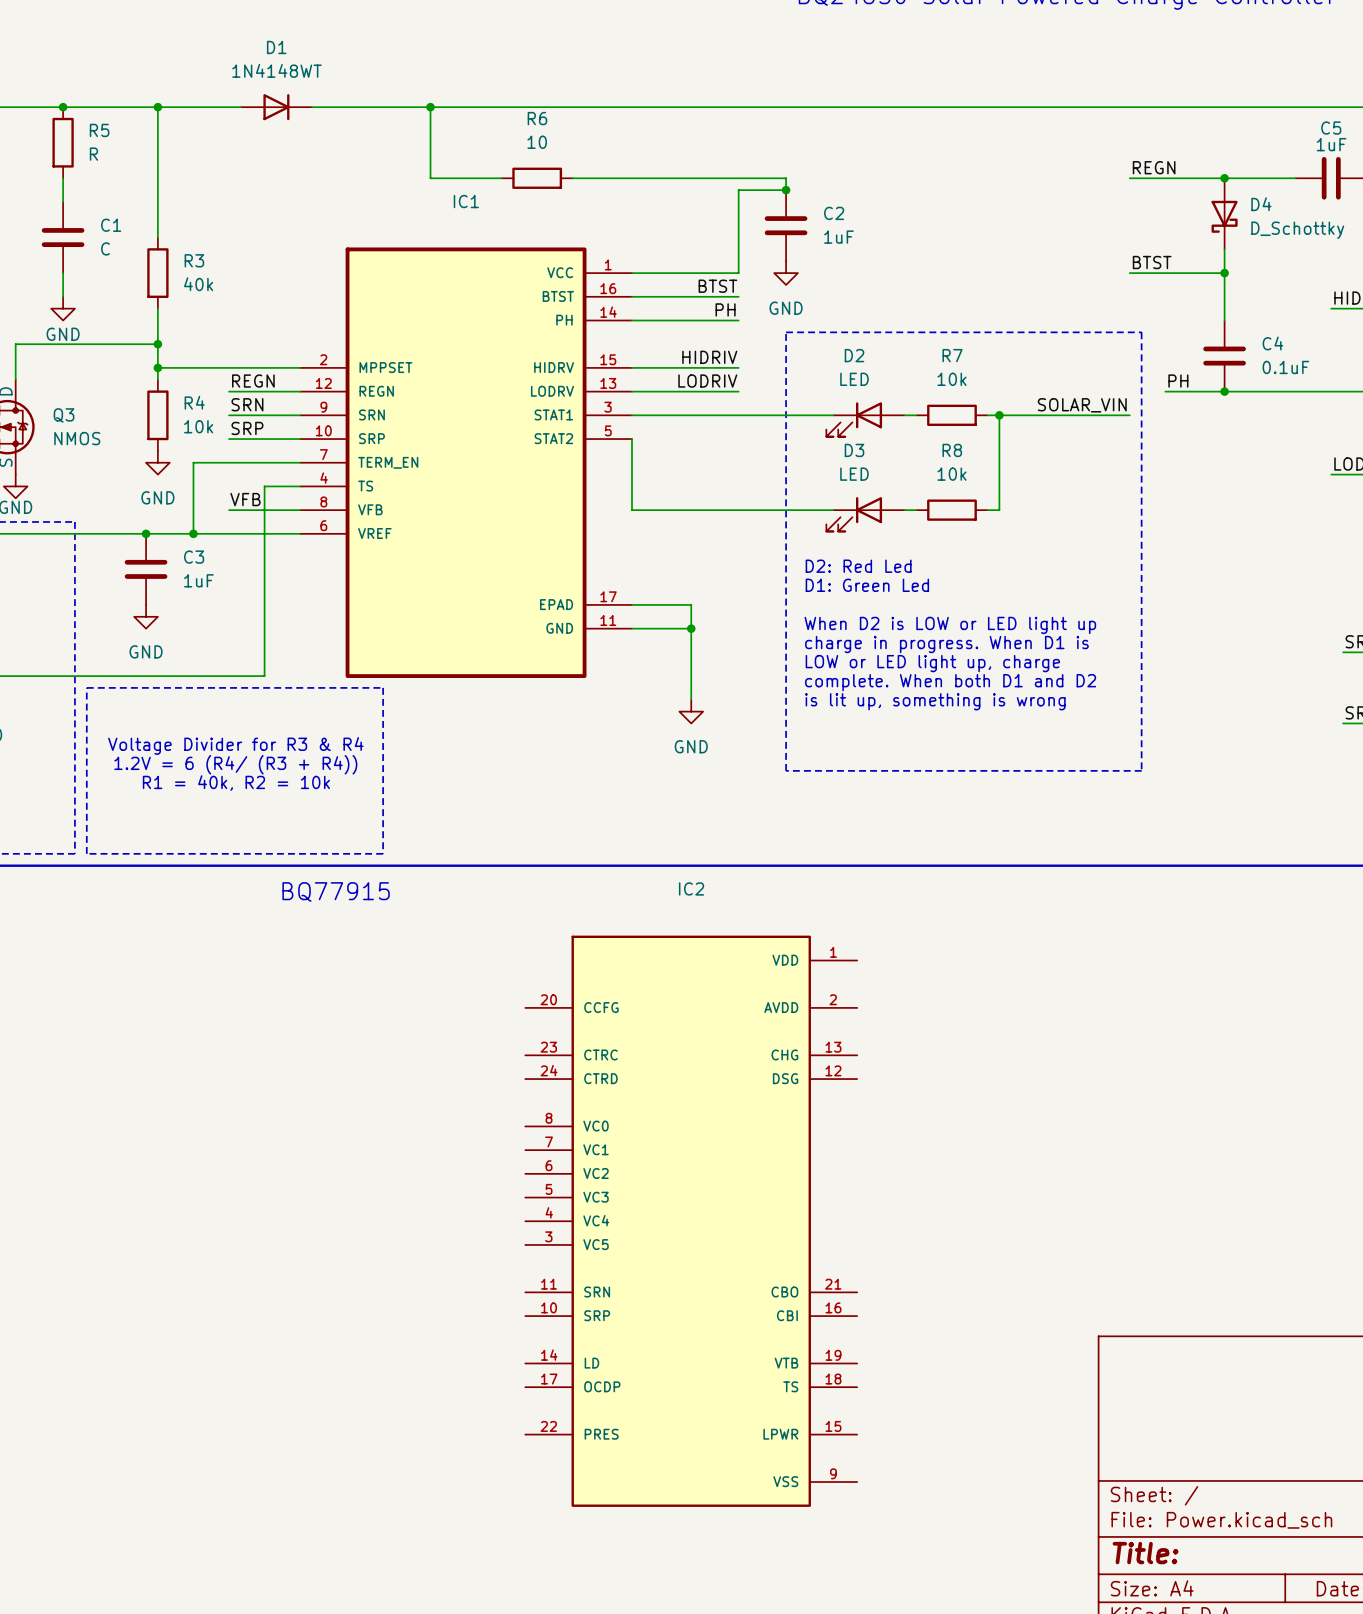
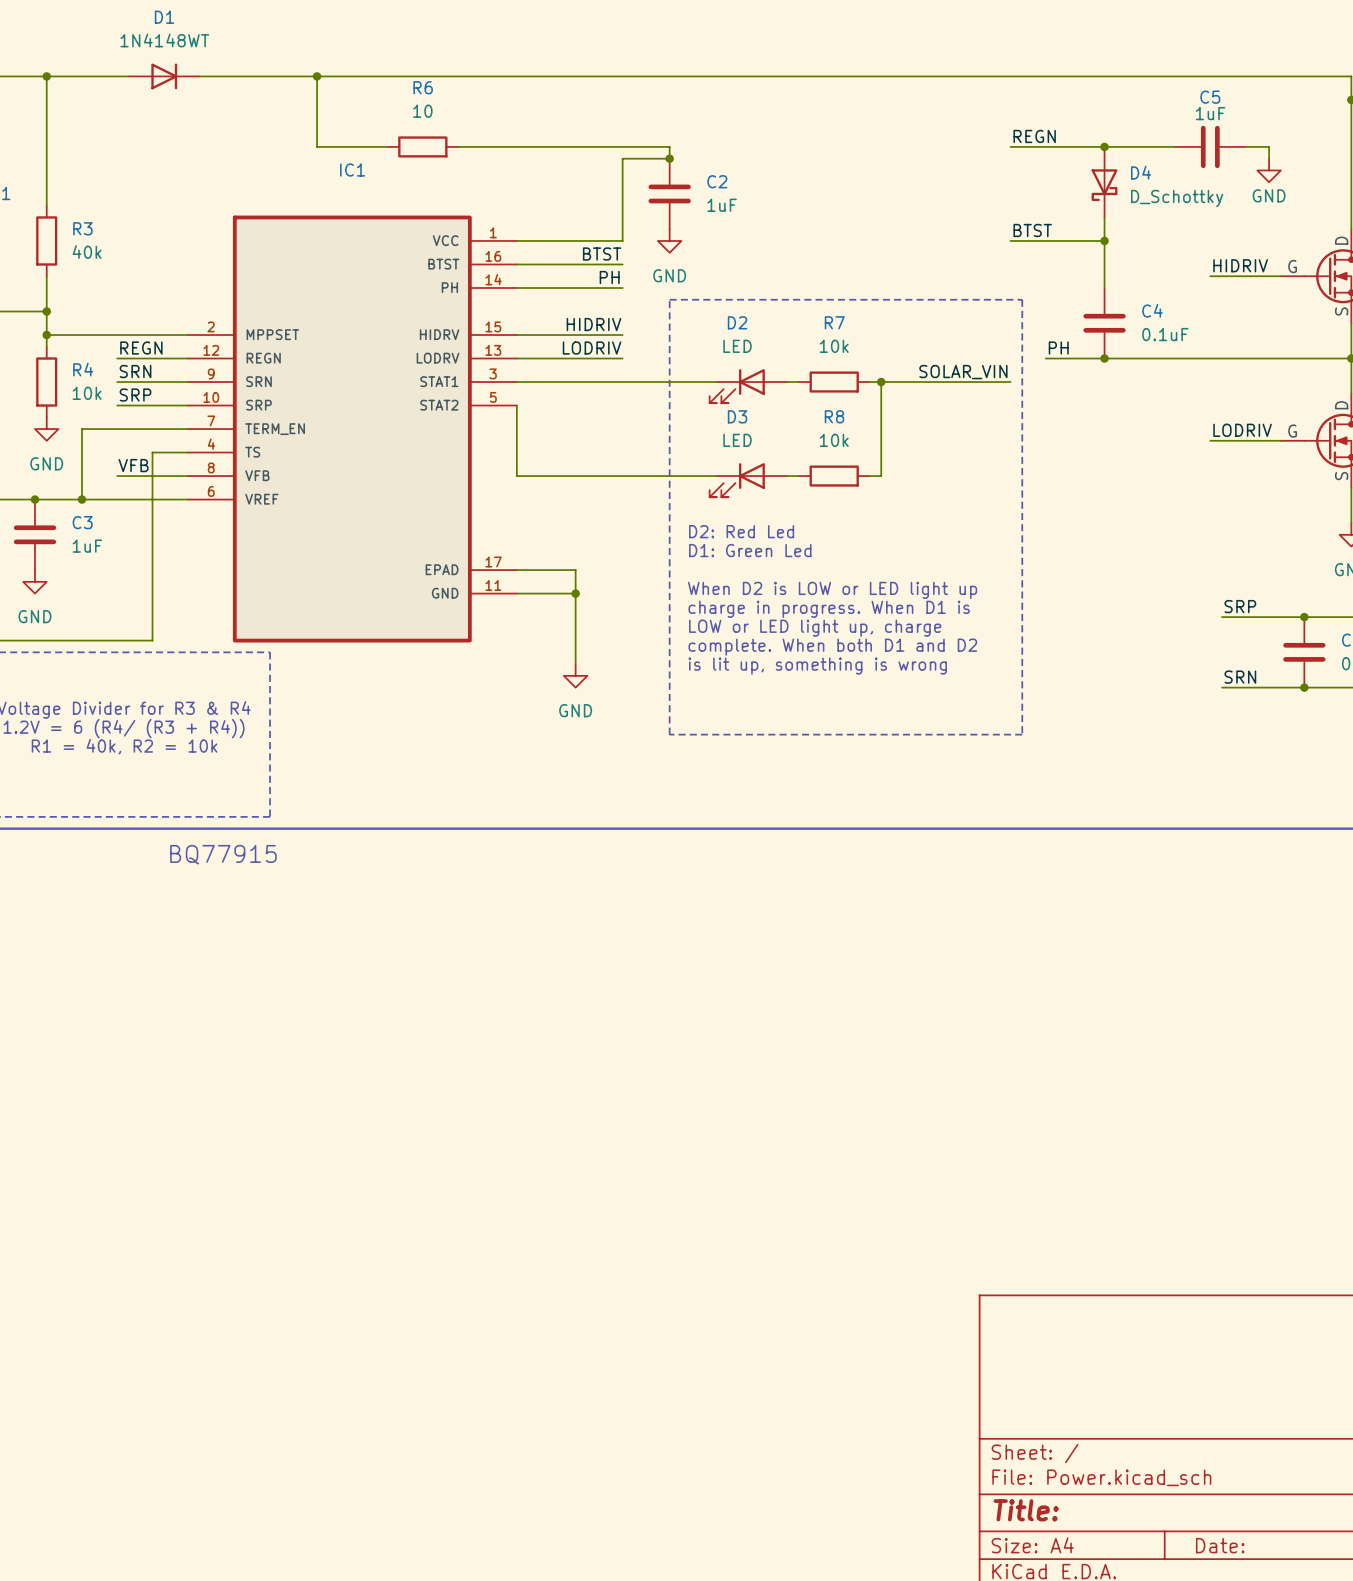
IC2: (691, 1221) -> none

